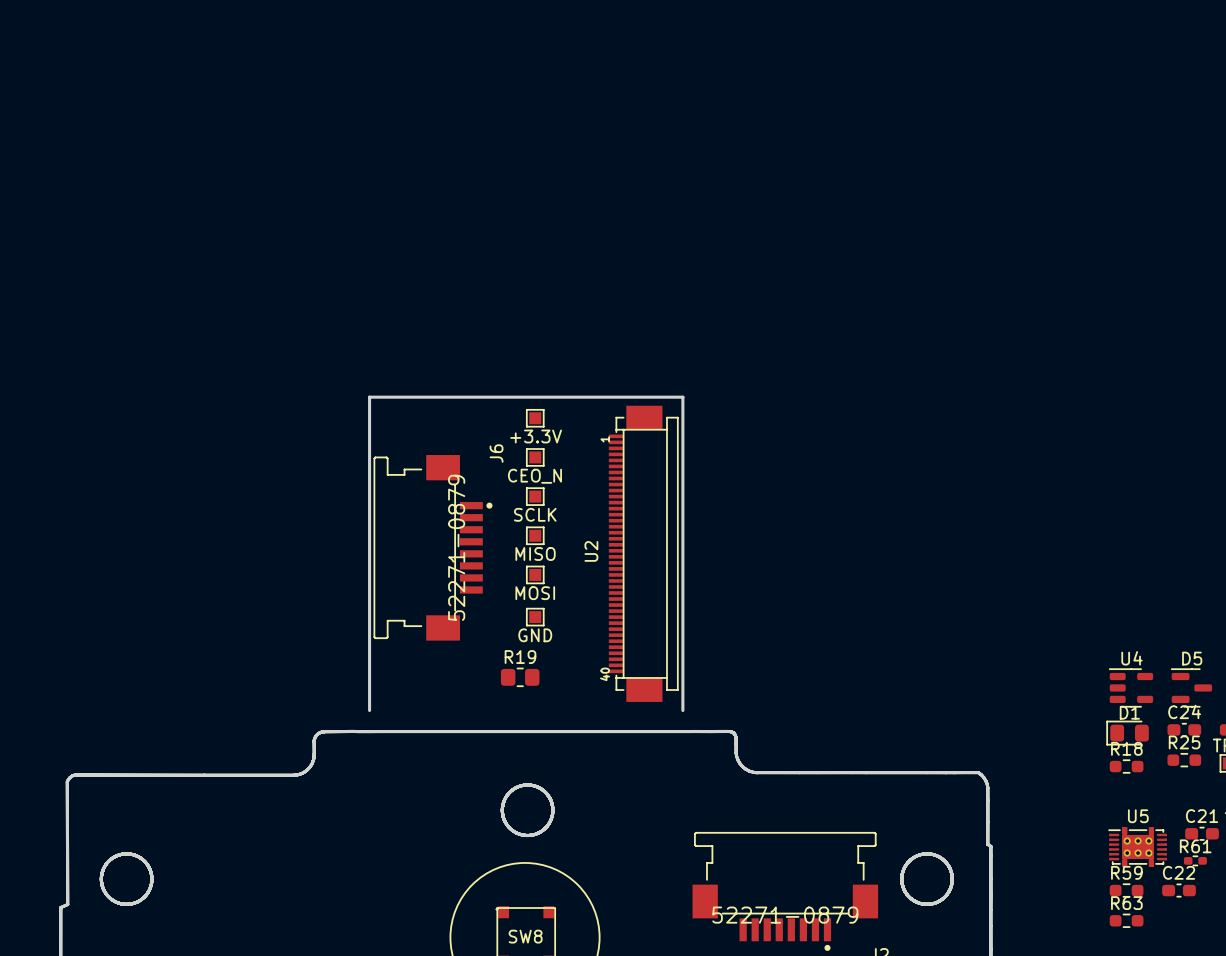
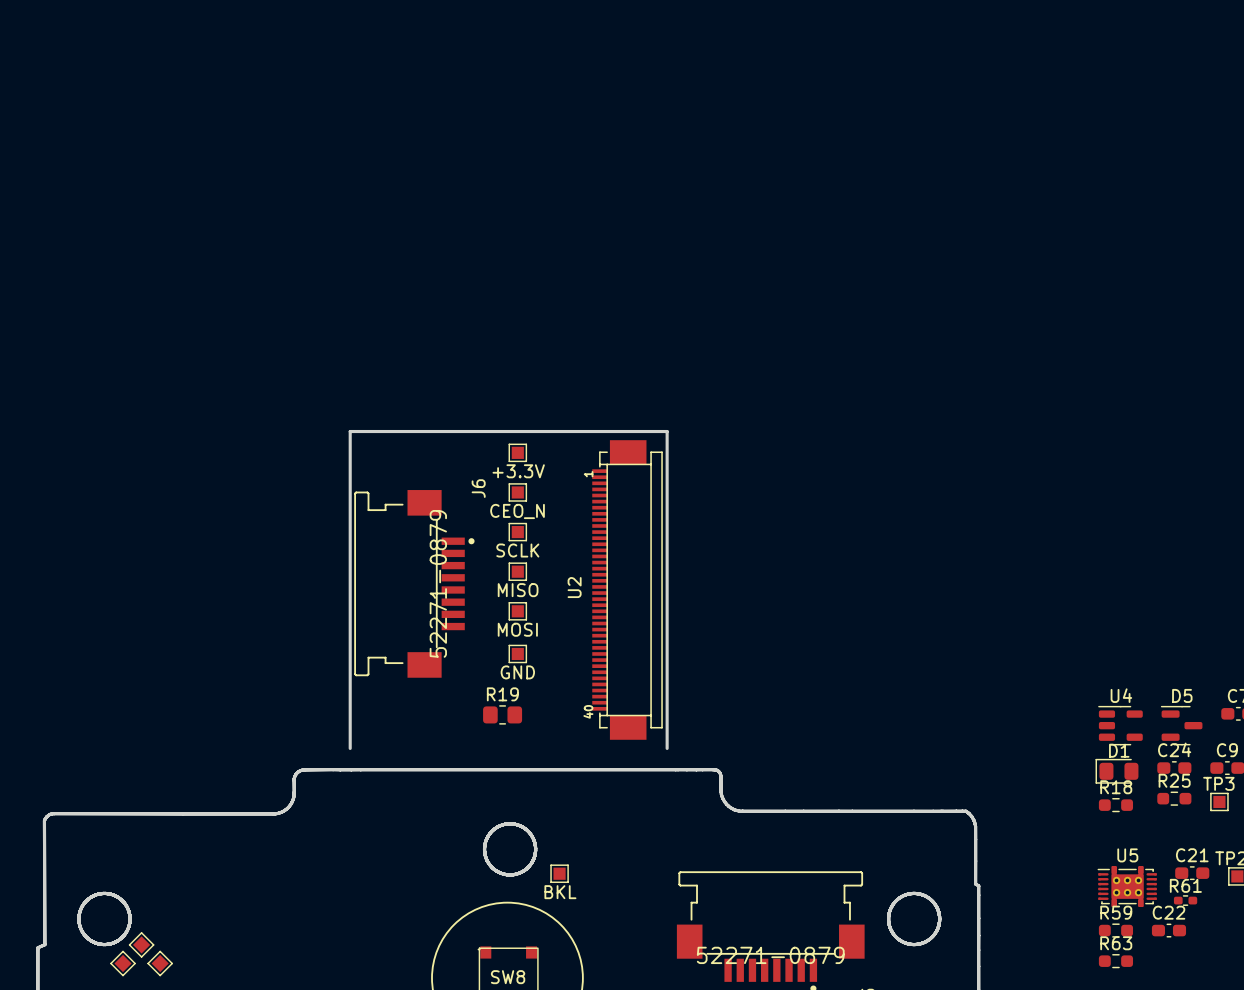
part: none -> BKL (559, 873)
part: none -> (141, 944)
part: none -> (123, 963)
part: none -> (160, 963)

